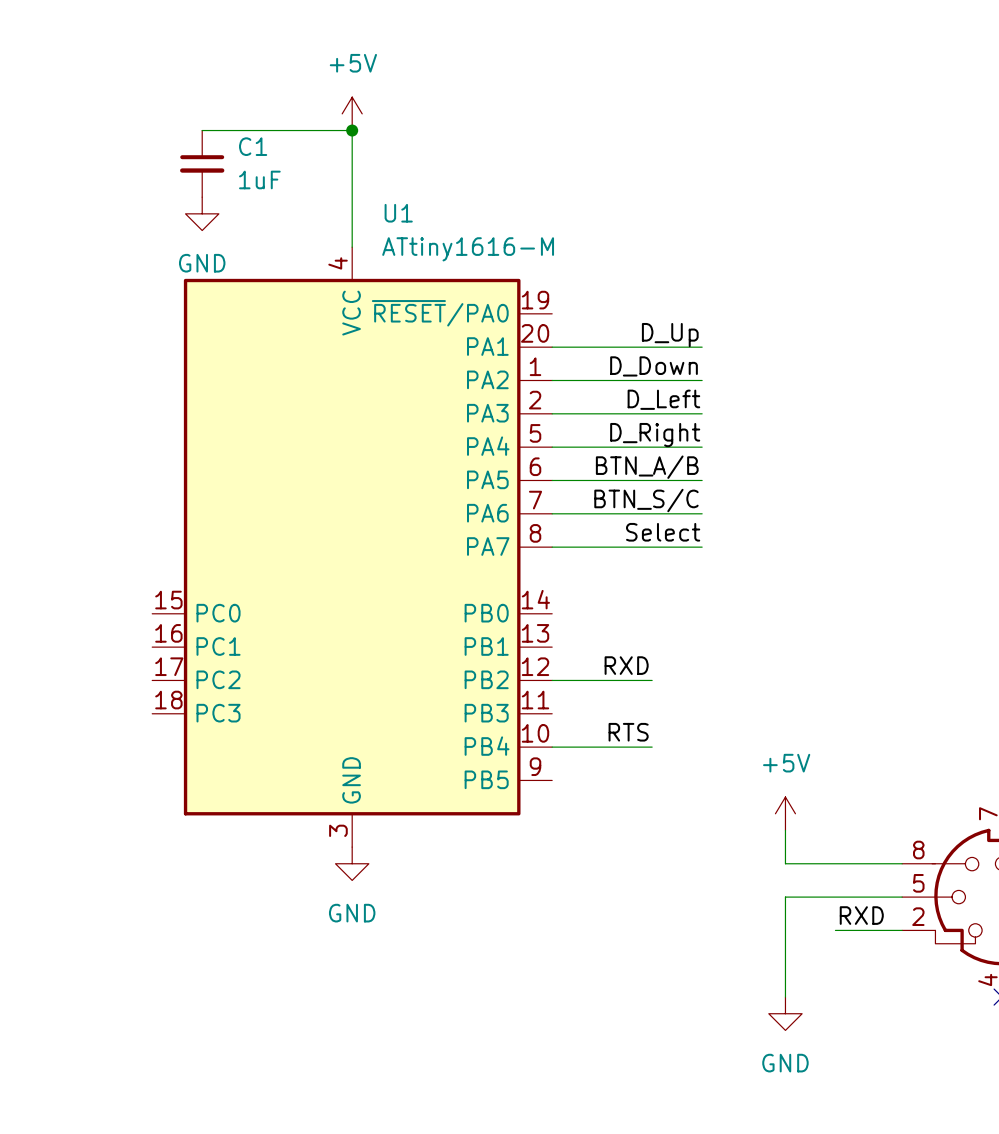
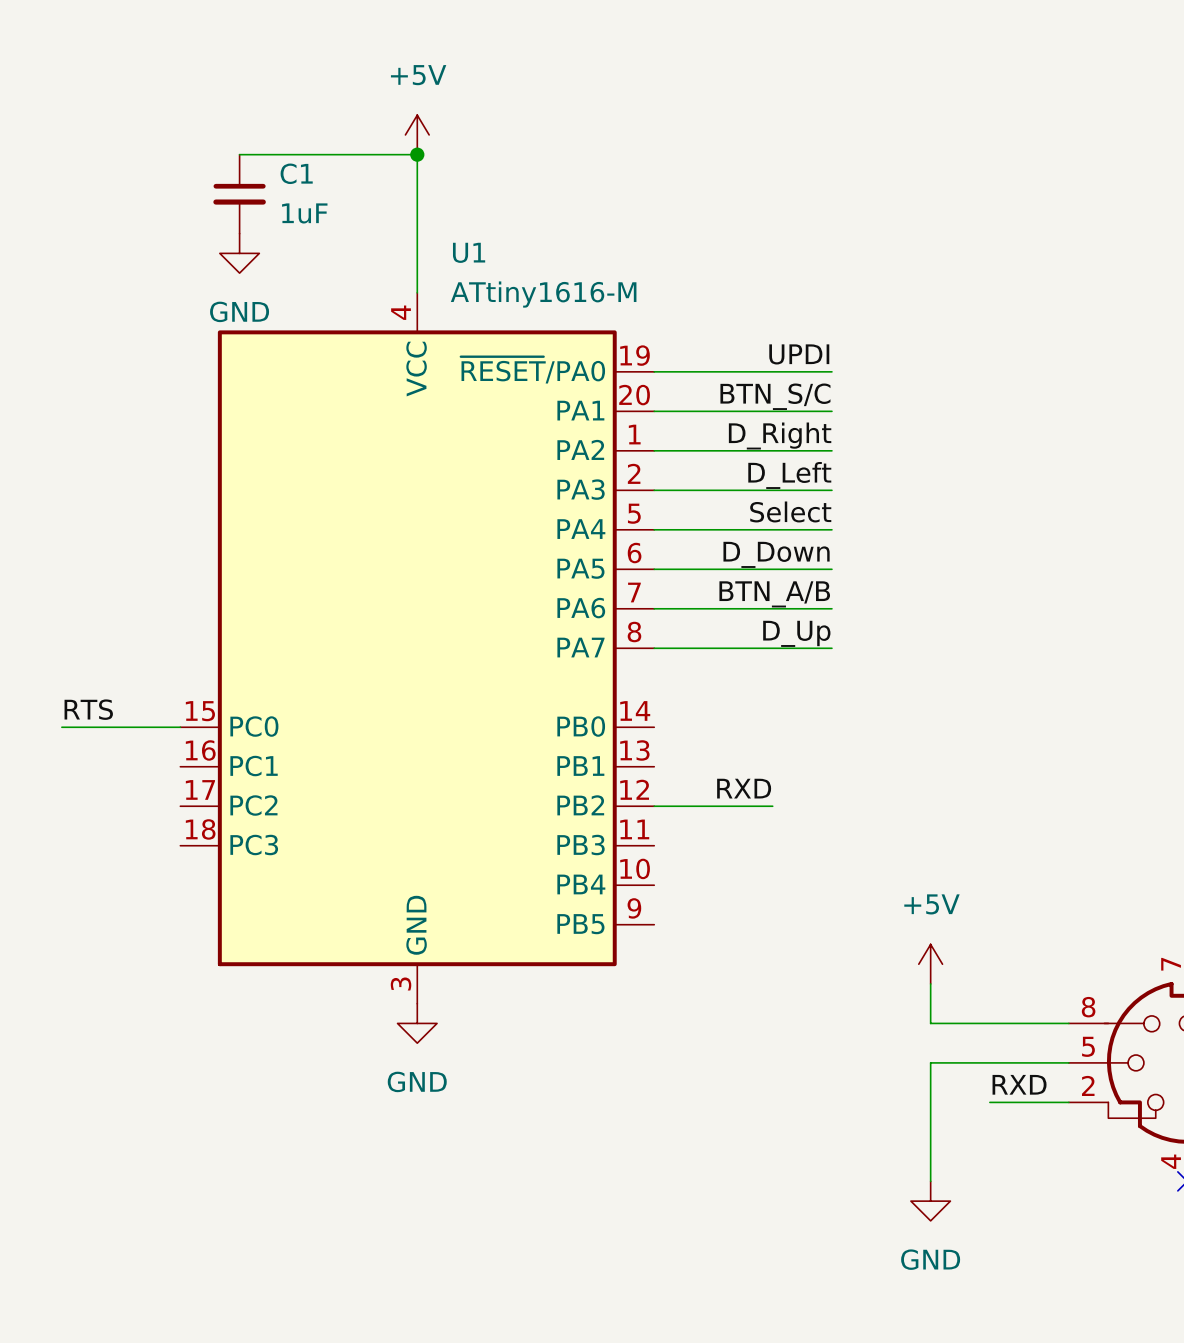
label: none -> UPDI (799, 354)
wire: none -> (654, 371) (831, 371)
label: D_Up (670, 335) -> BTN_S/C (775, 396)
label: D_Down (654, 366) -> D_Right (780, 435)
label: D_Right (655, 435) -> Select (790, 511)
label: BTN_A/B (647, 467) -> D_Down (776, 554)
label: BTN_S/C (646, 500) -> BTN_A/B (774, 594)
label: Select (663, 532) -> D_Up (796, 633)
label: none -> RTS (88, 709)
wire: none -> (61, 727) (180, 727)
label: RTS (628, 732) -> none
wire: (552, 747) (652, 747) -> none

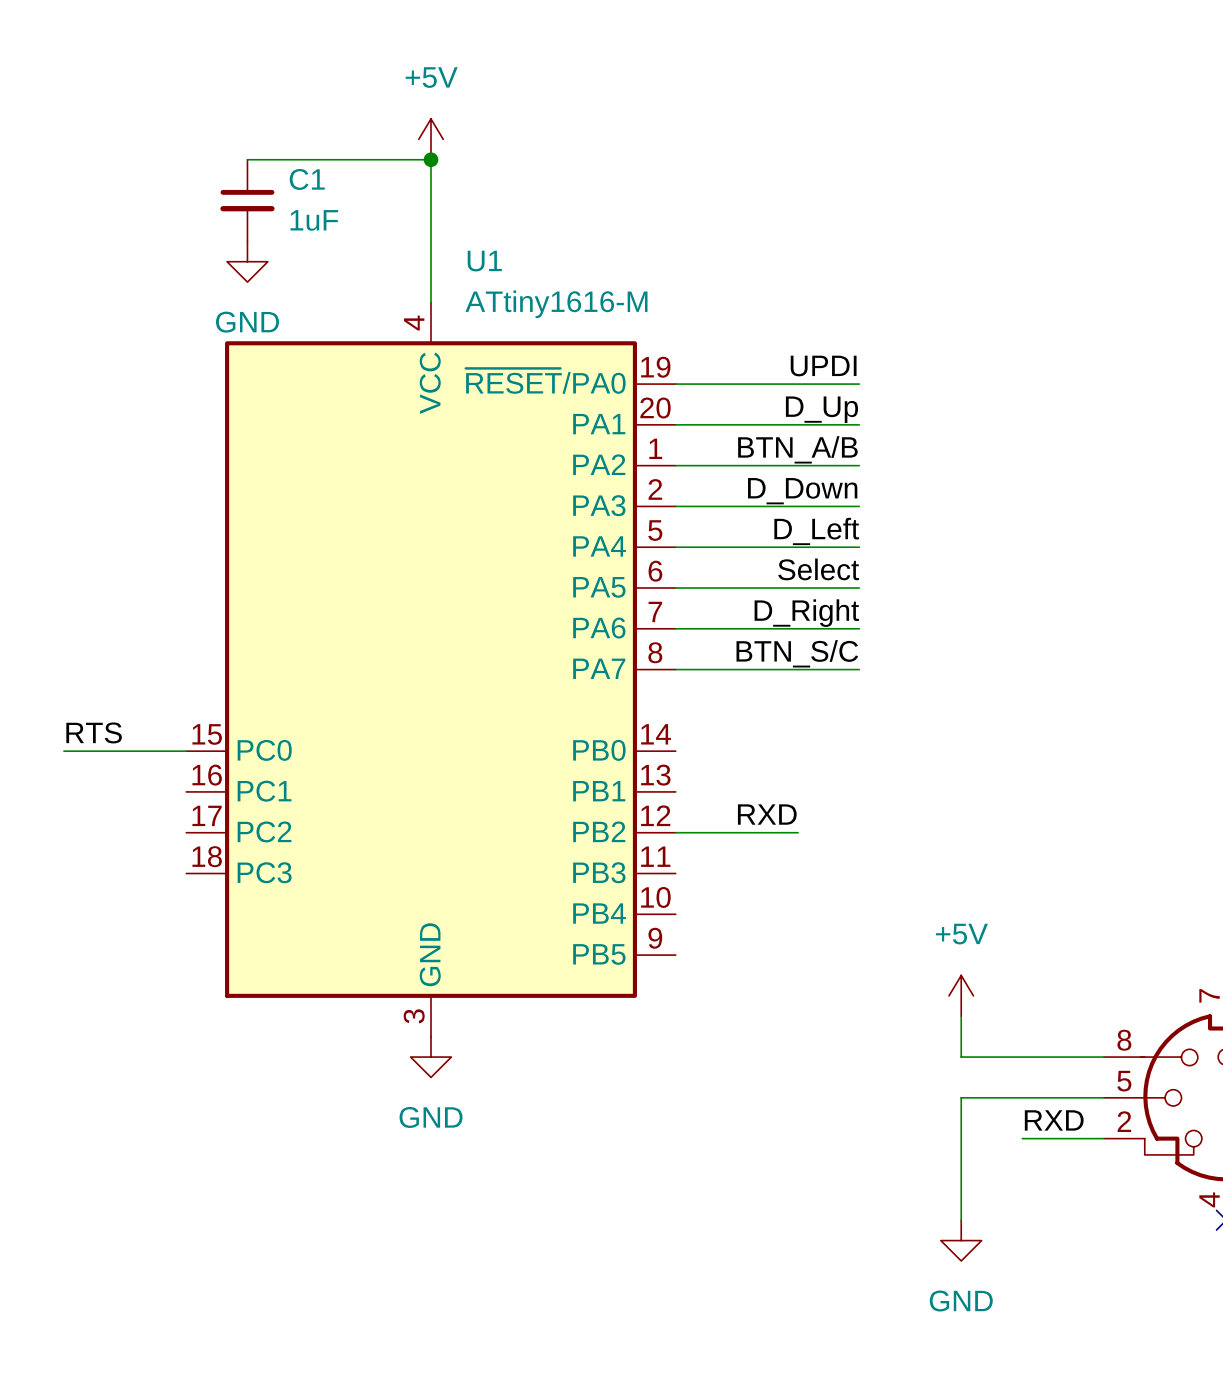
label: BTN_S/C (775, 396) -> D_Up (821, 409)
label: D_Right (780, 435) -> BTN_A/B (797, 449)
label: D_Left (789, 475) -> D_Down (802, 491)
label: Select (790, 511) -> D_Left (816, 531)
label: D_Down (776, 554) -> Select (818, 569)
label: BTN_A/B (774, 594) -> D_Right (806, 613)
label: D_Up (796, 633) -> BTN_S/C (797, 653)

